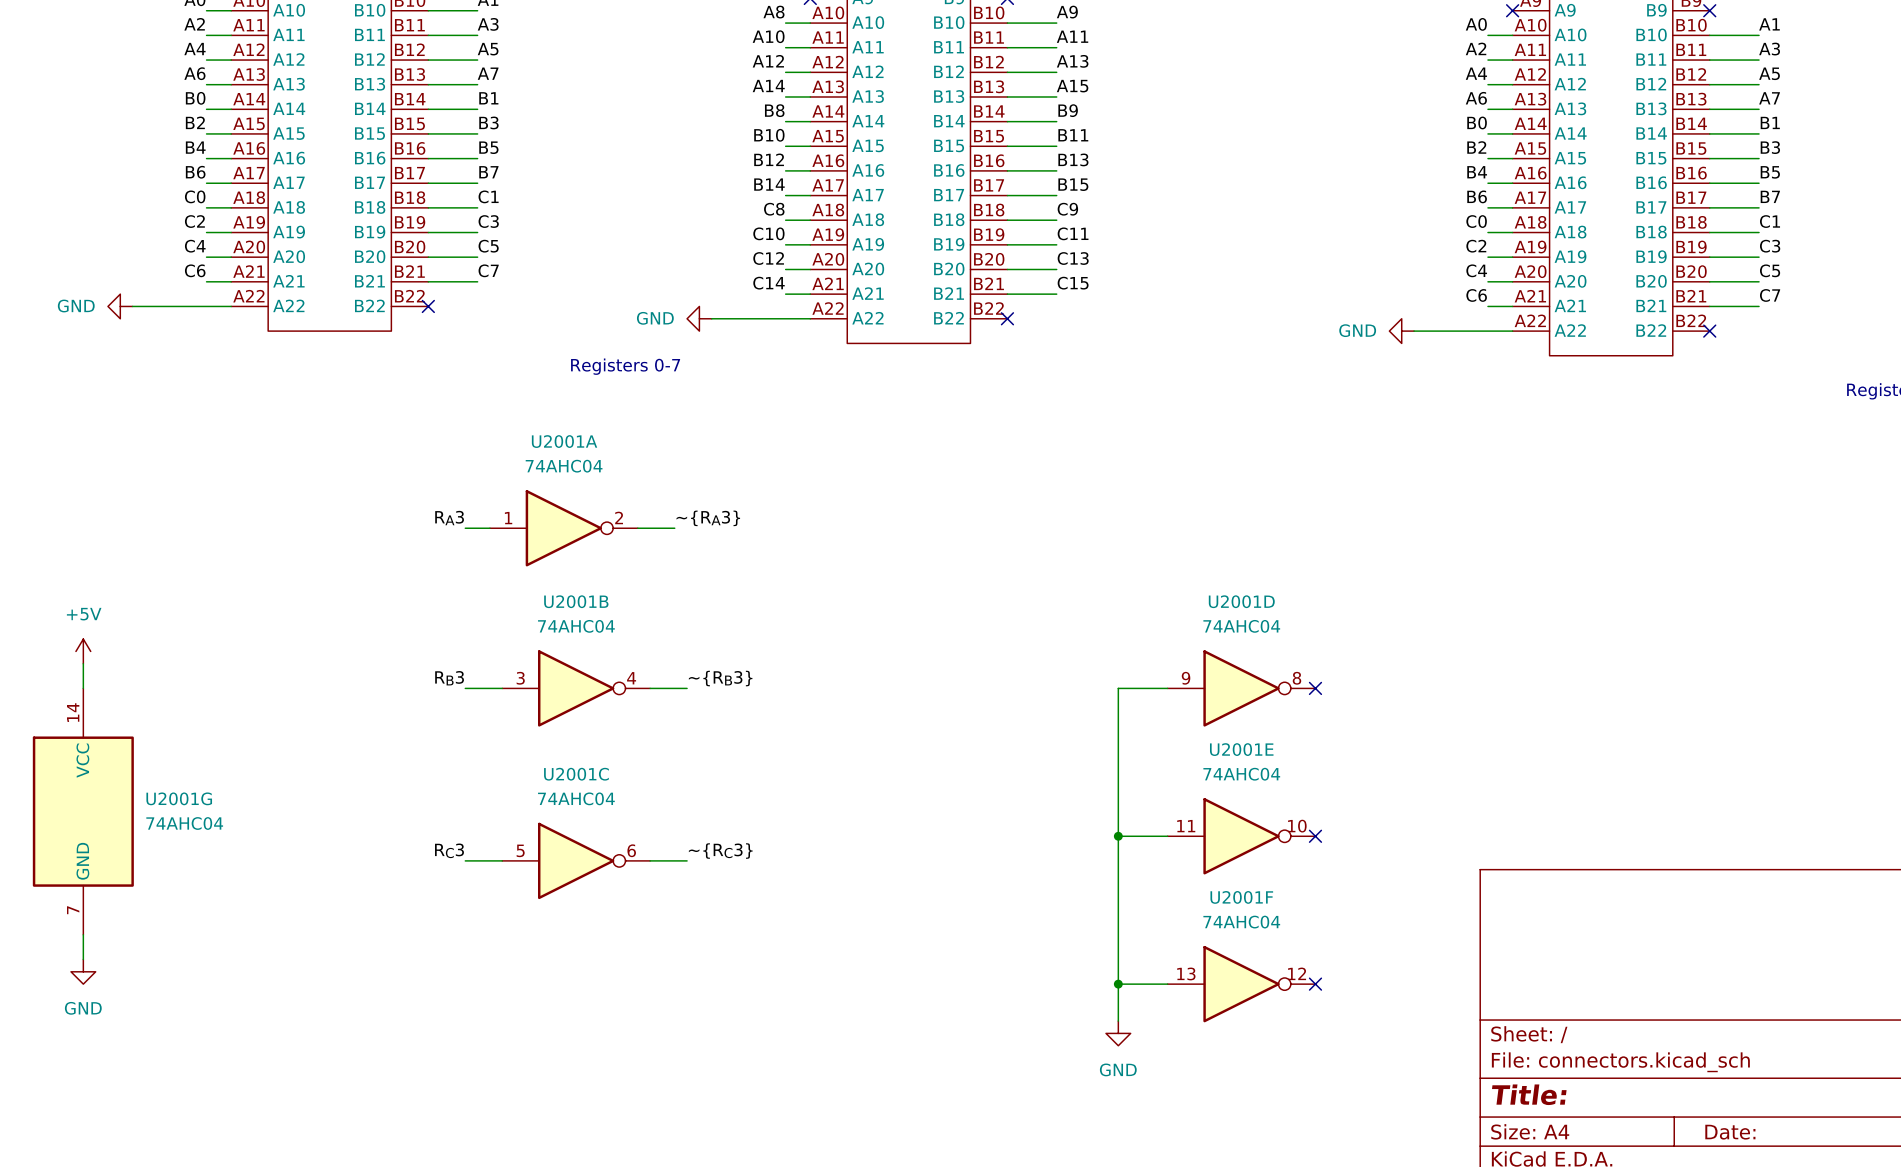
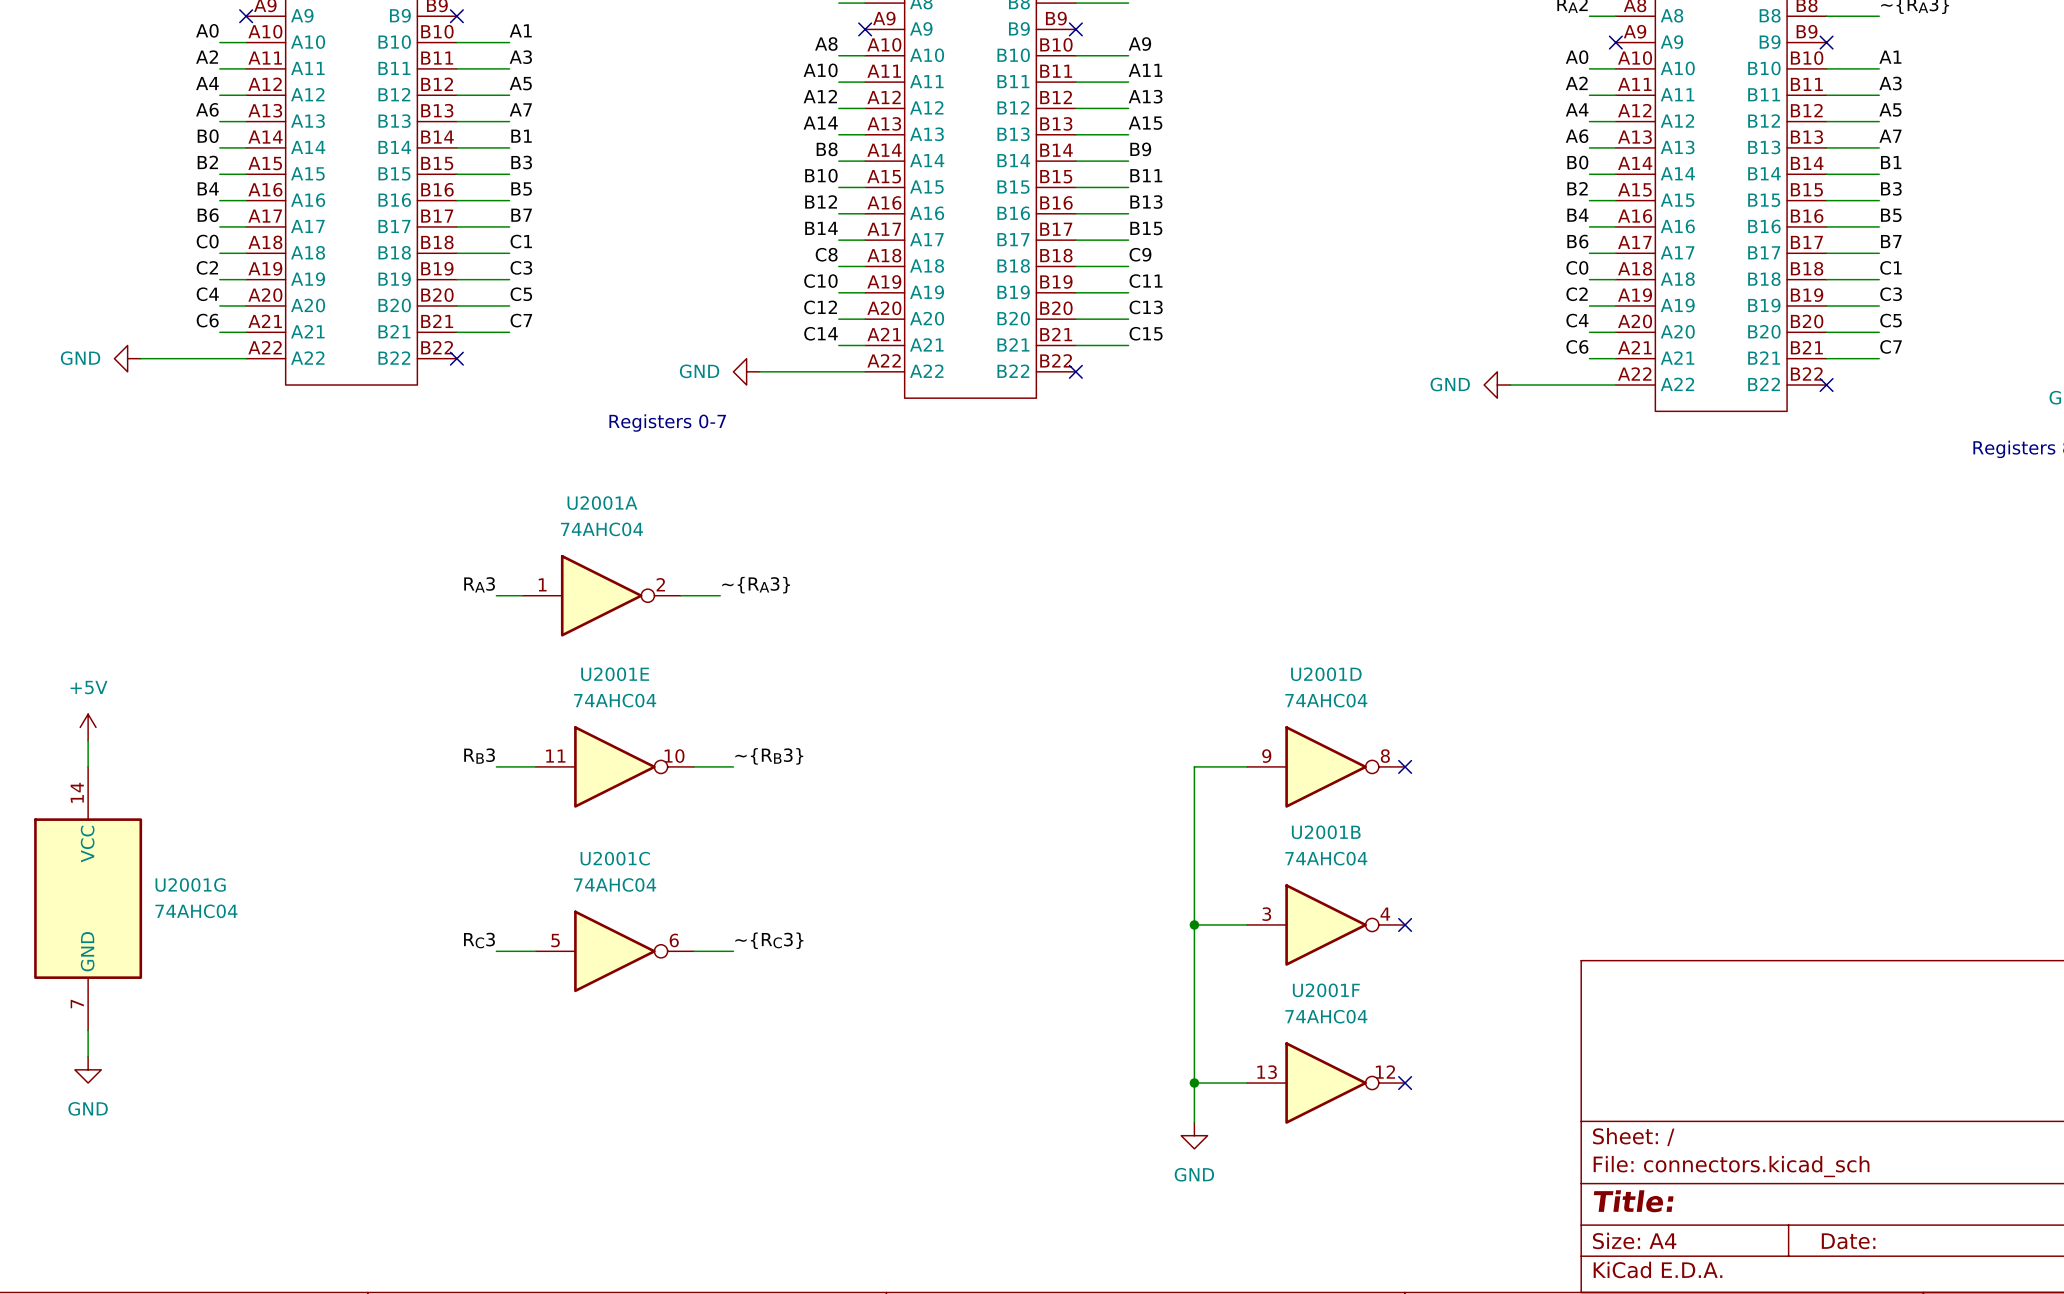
U2001B position: (576, 688) -> (1326, 924)
U2001E position: (1241, 836) -> (614, 766)

